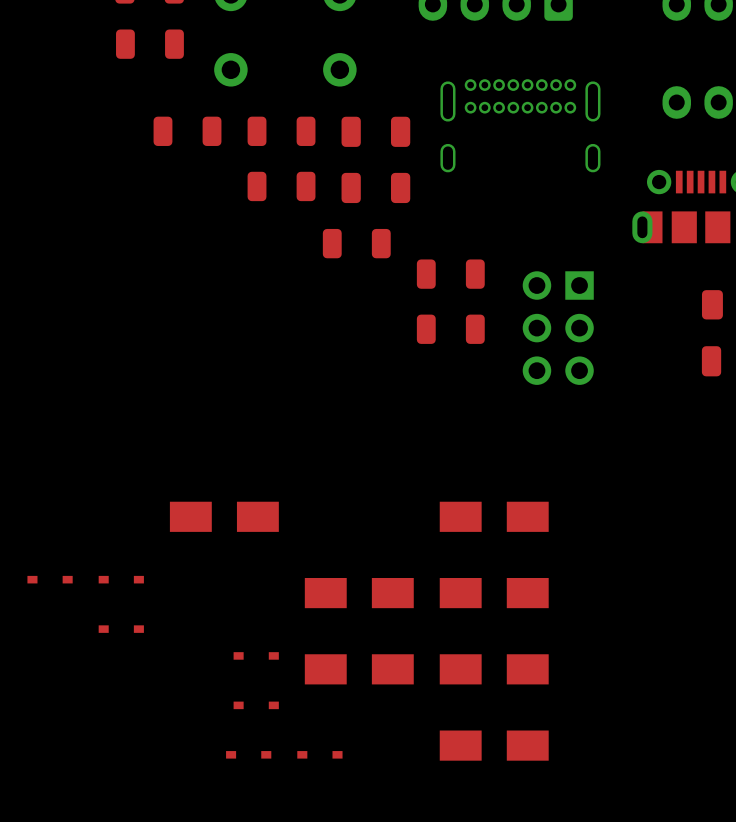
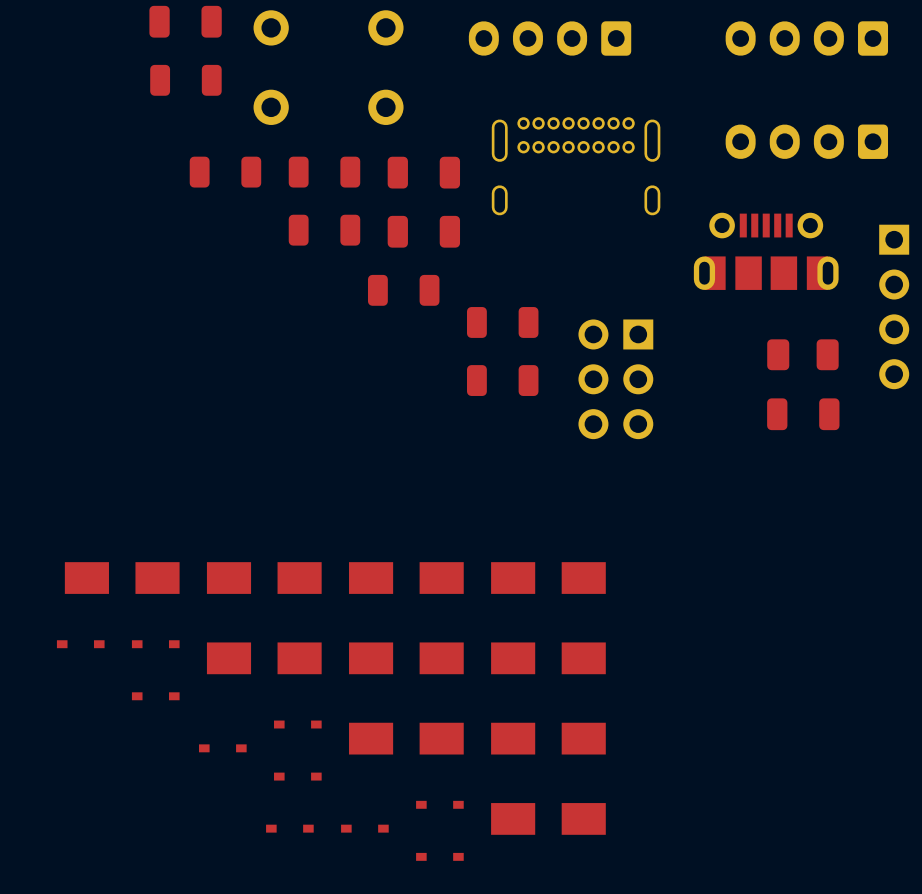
part: none -> (122, 578)
part: none -> (406, 578)
part: none -> (264, 658)
part: none -> (222, 748)
part: none -> (439, 804)
part: none -> (439, 856)

